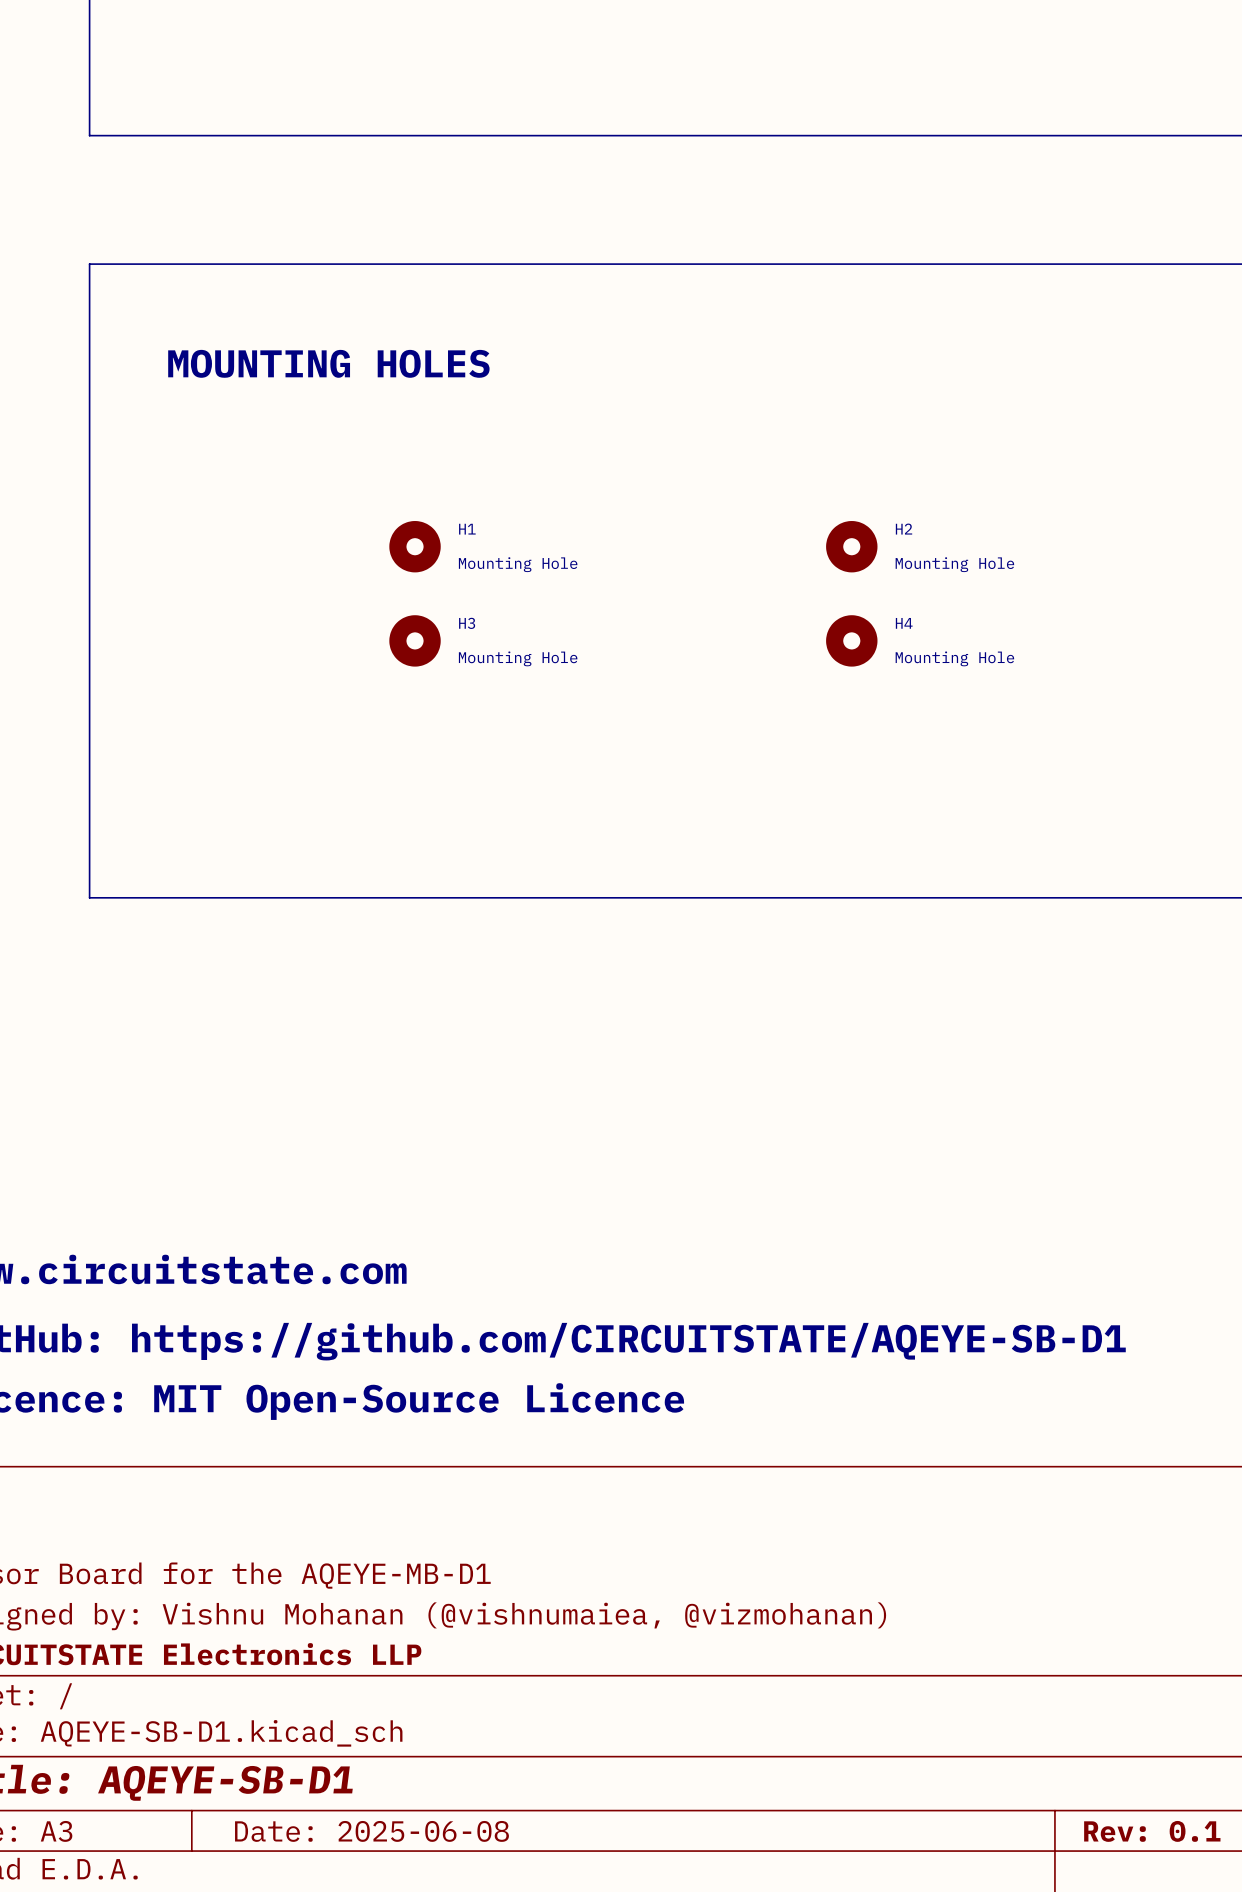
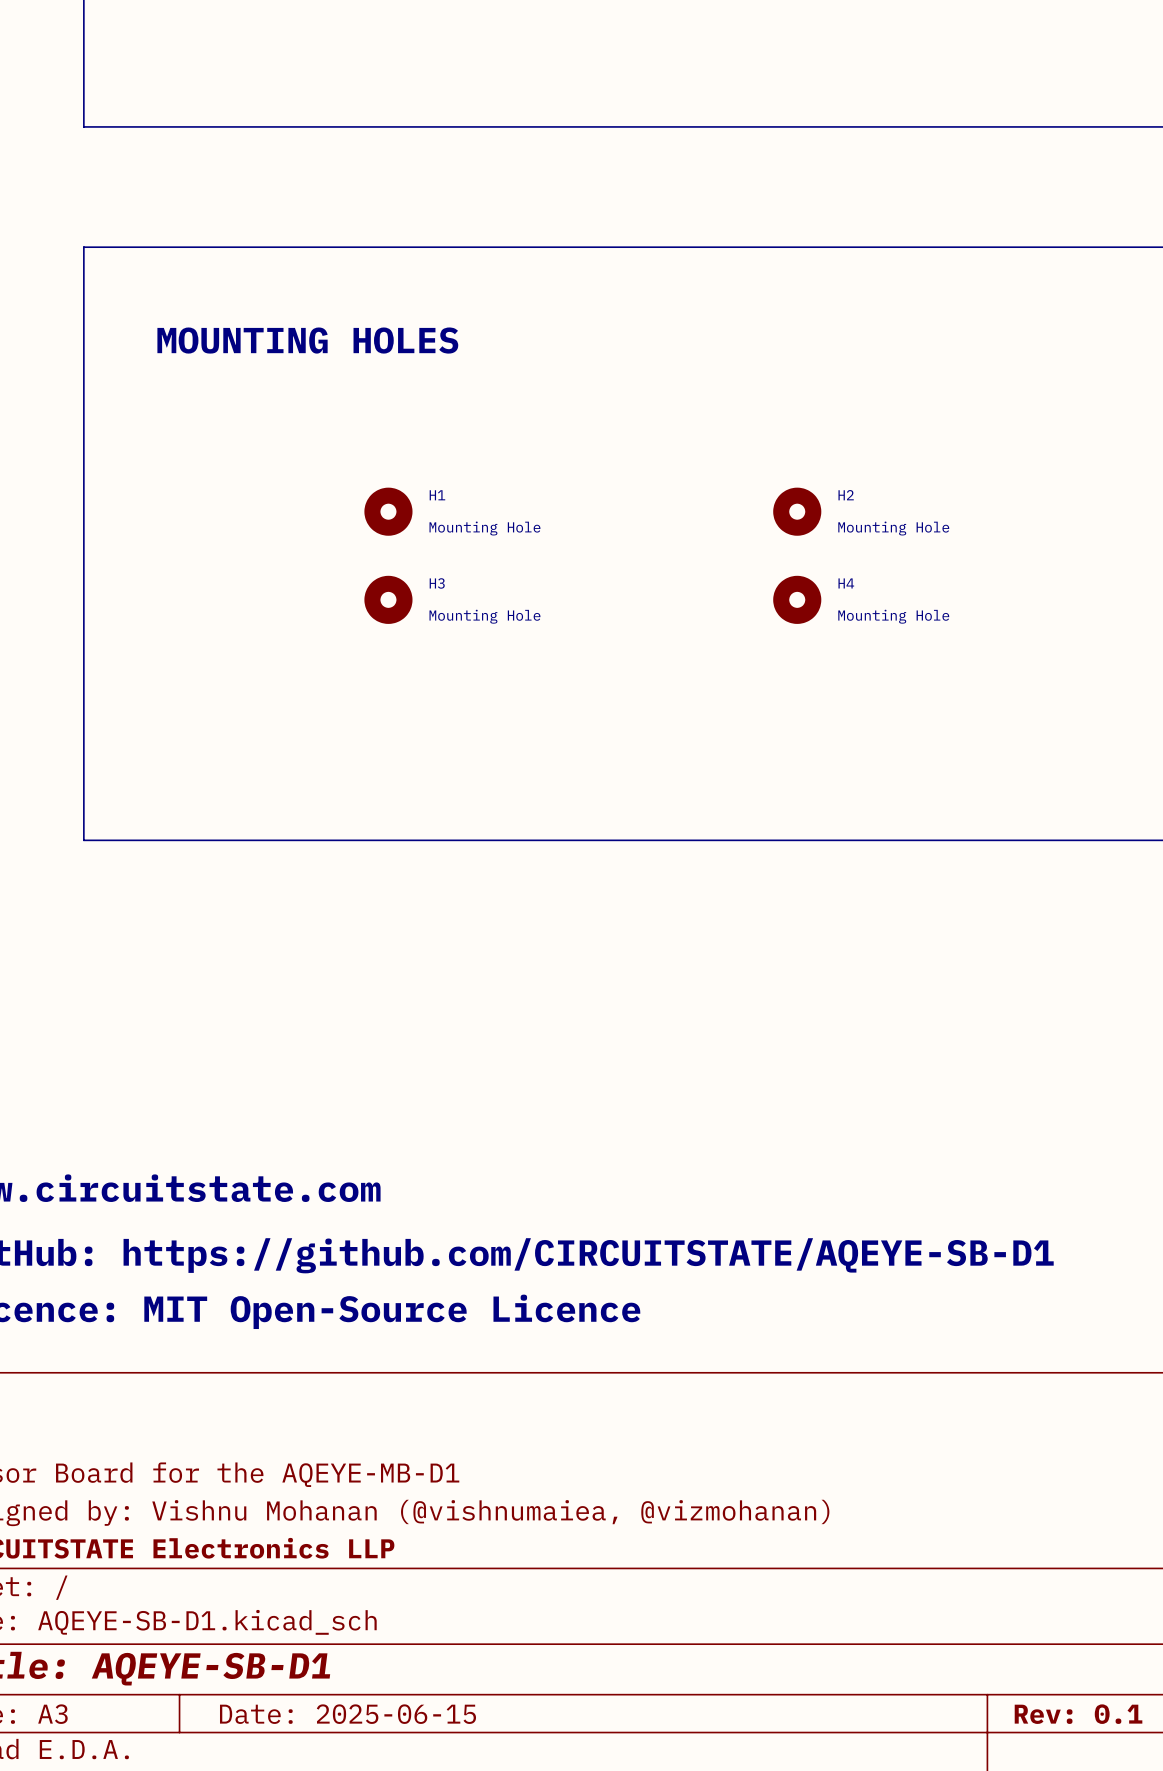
title block: Date: 2025-06-08 (371, 1831) -> Date: 2025-06-15 (348, 1714)

